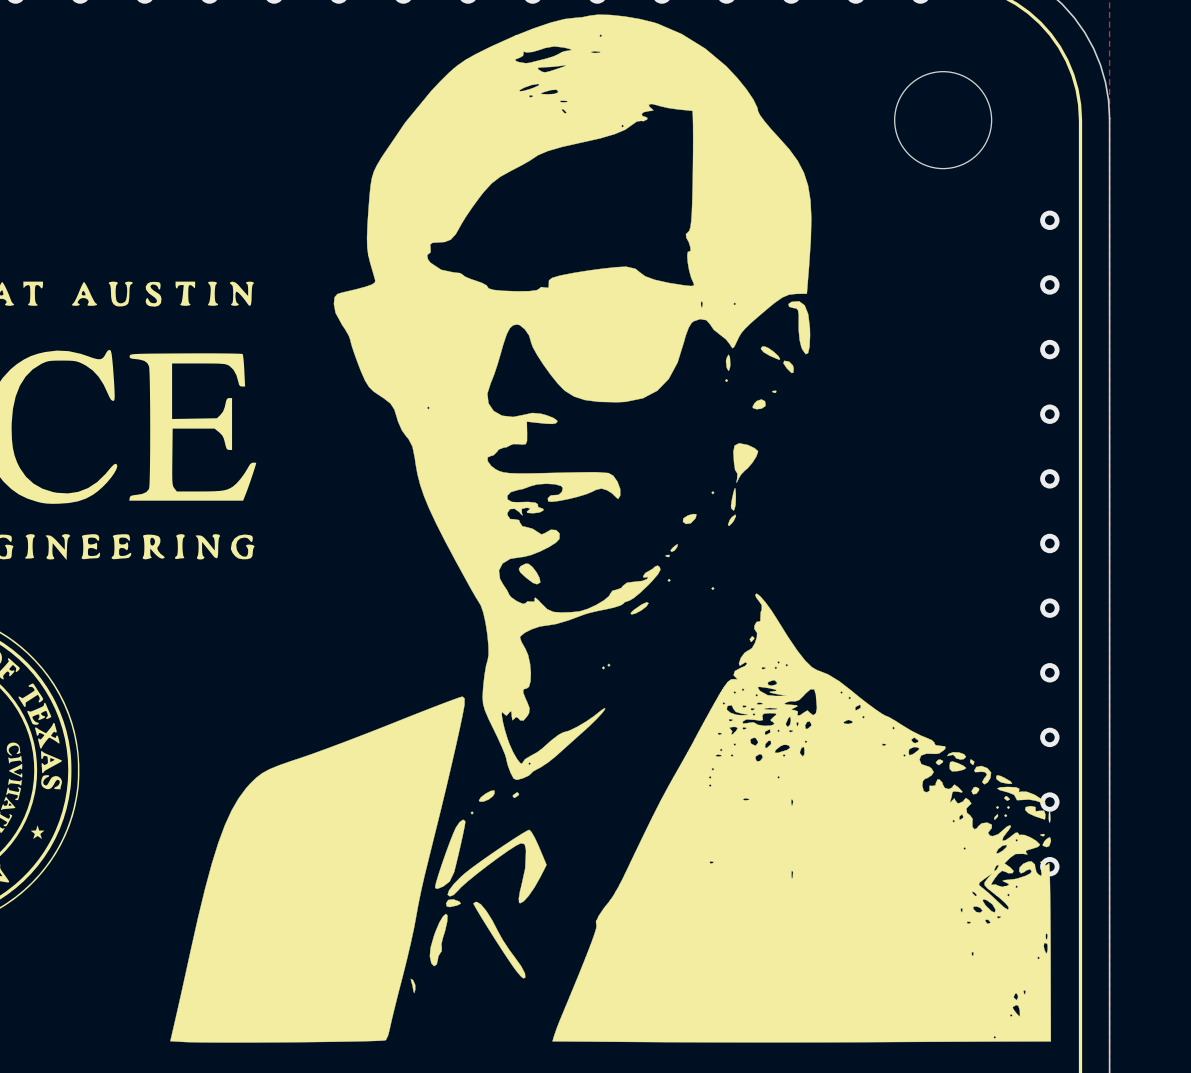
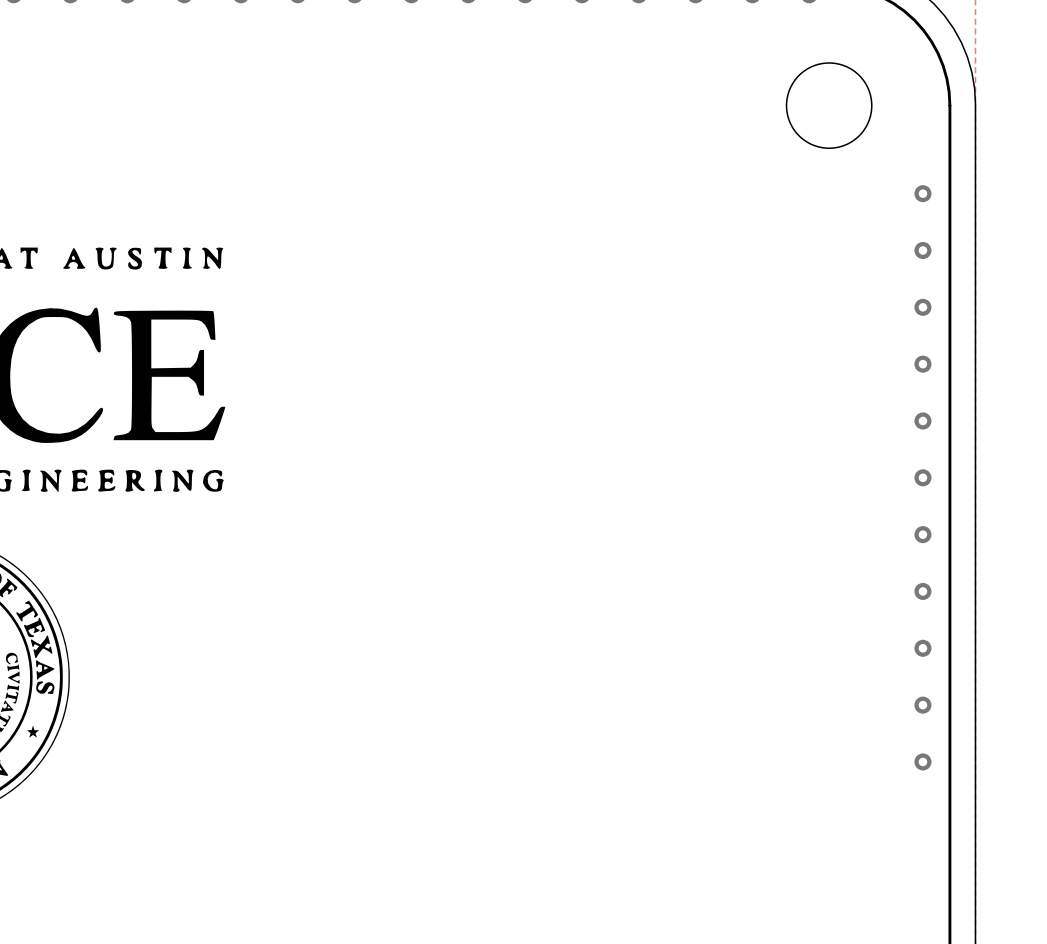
drawing: [170, 14, 1052, 1043] -> none

